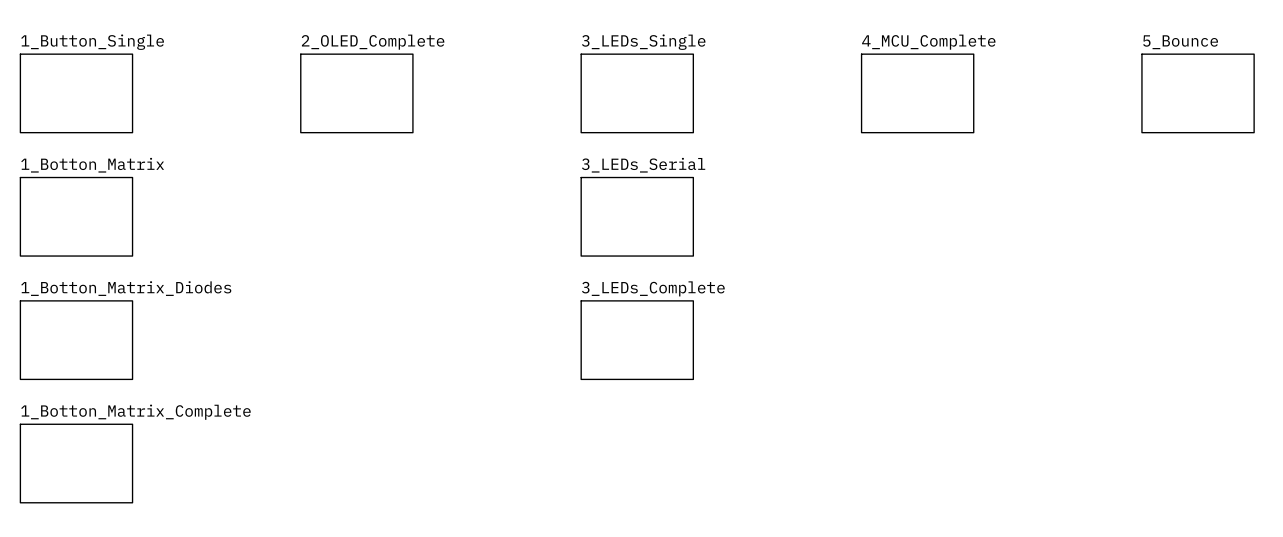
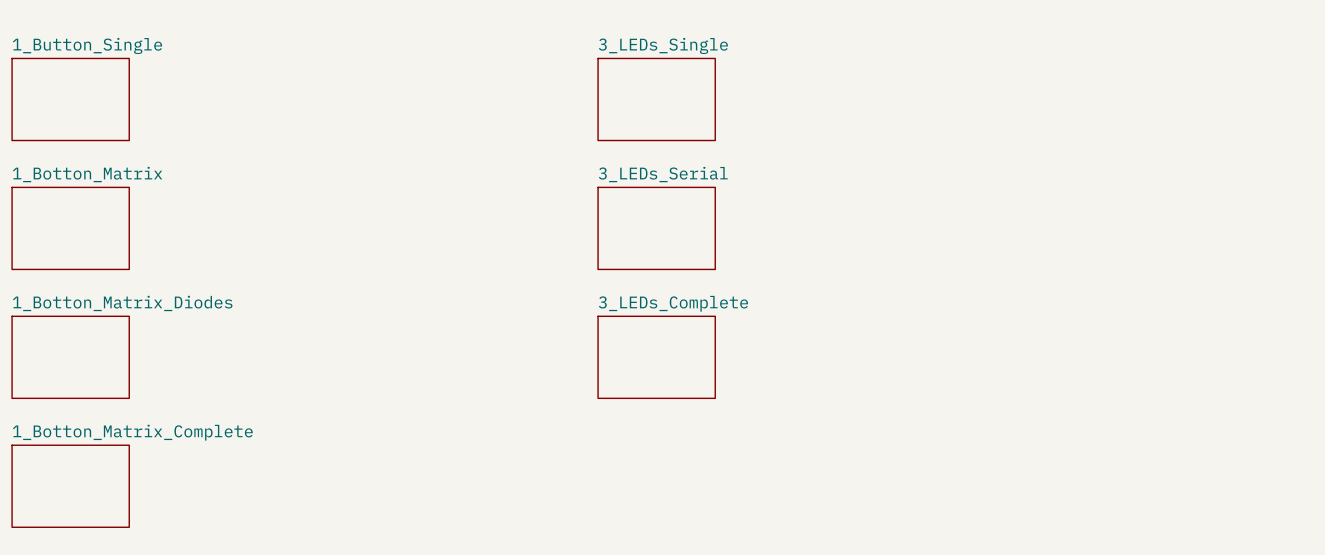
sheet 2_OLED_Complete: (356, 93) -> none
sheet 4_MCU_Complete: (917, 93) -> none
sheet 5_Bounce: (1198, 93) -> none

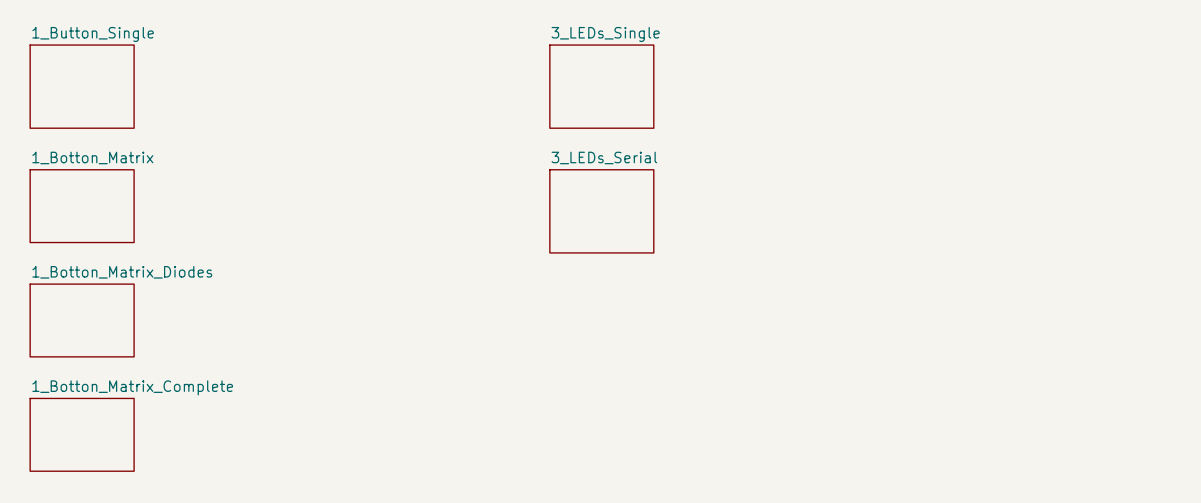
sheet 1_Button_Single shape: [11, 57, 130, 142] -> [29, 44, 135, 129]
sheet 3_LEDs_Single shape: [597, 57, 716, 142] -> [549, 44, 655, 129]
sheet 3_LEDs_Serial shape: [597, 186, 716, 271] -> [549, 169, 655, 254]
sheet 3_LEDs_Complete: (656, 357) -> none

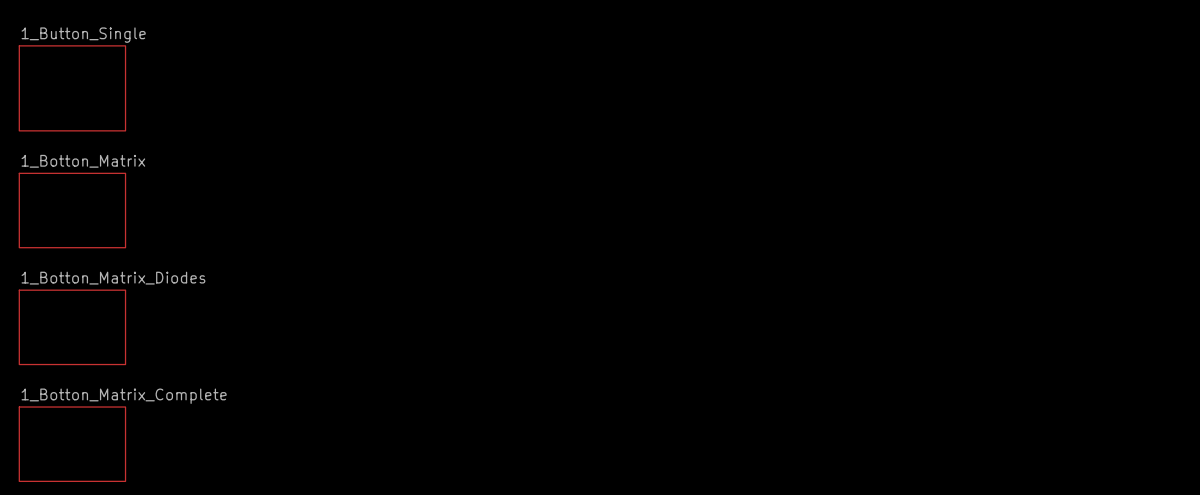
sheet 3_LEDs_Single: (601, 86) -> none
sheet 3_LEDs_Serial: (601, 211) -> none

